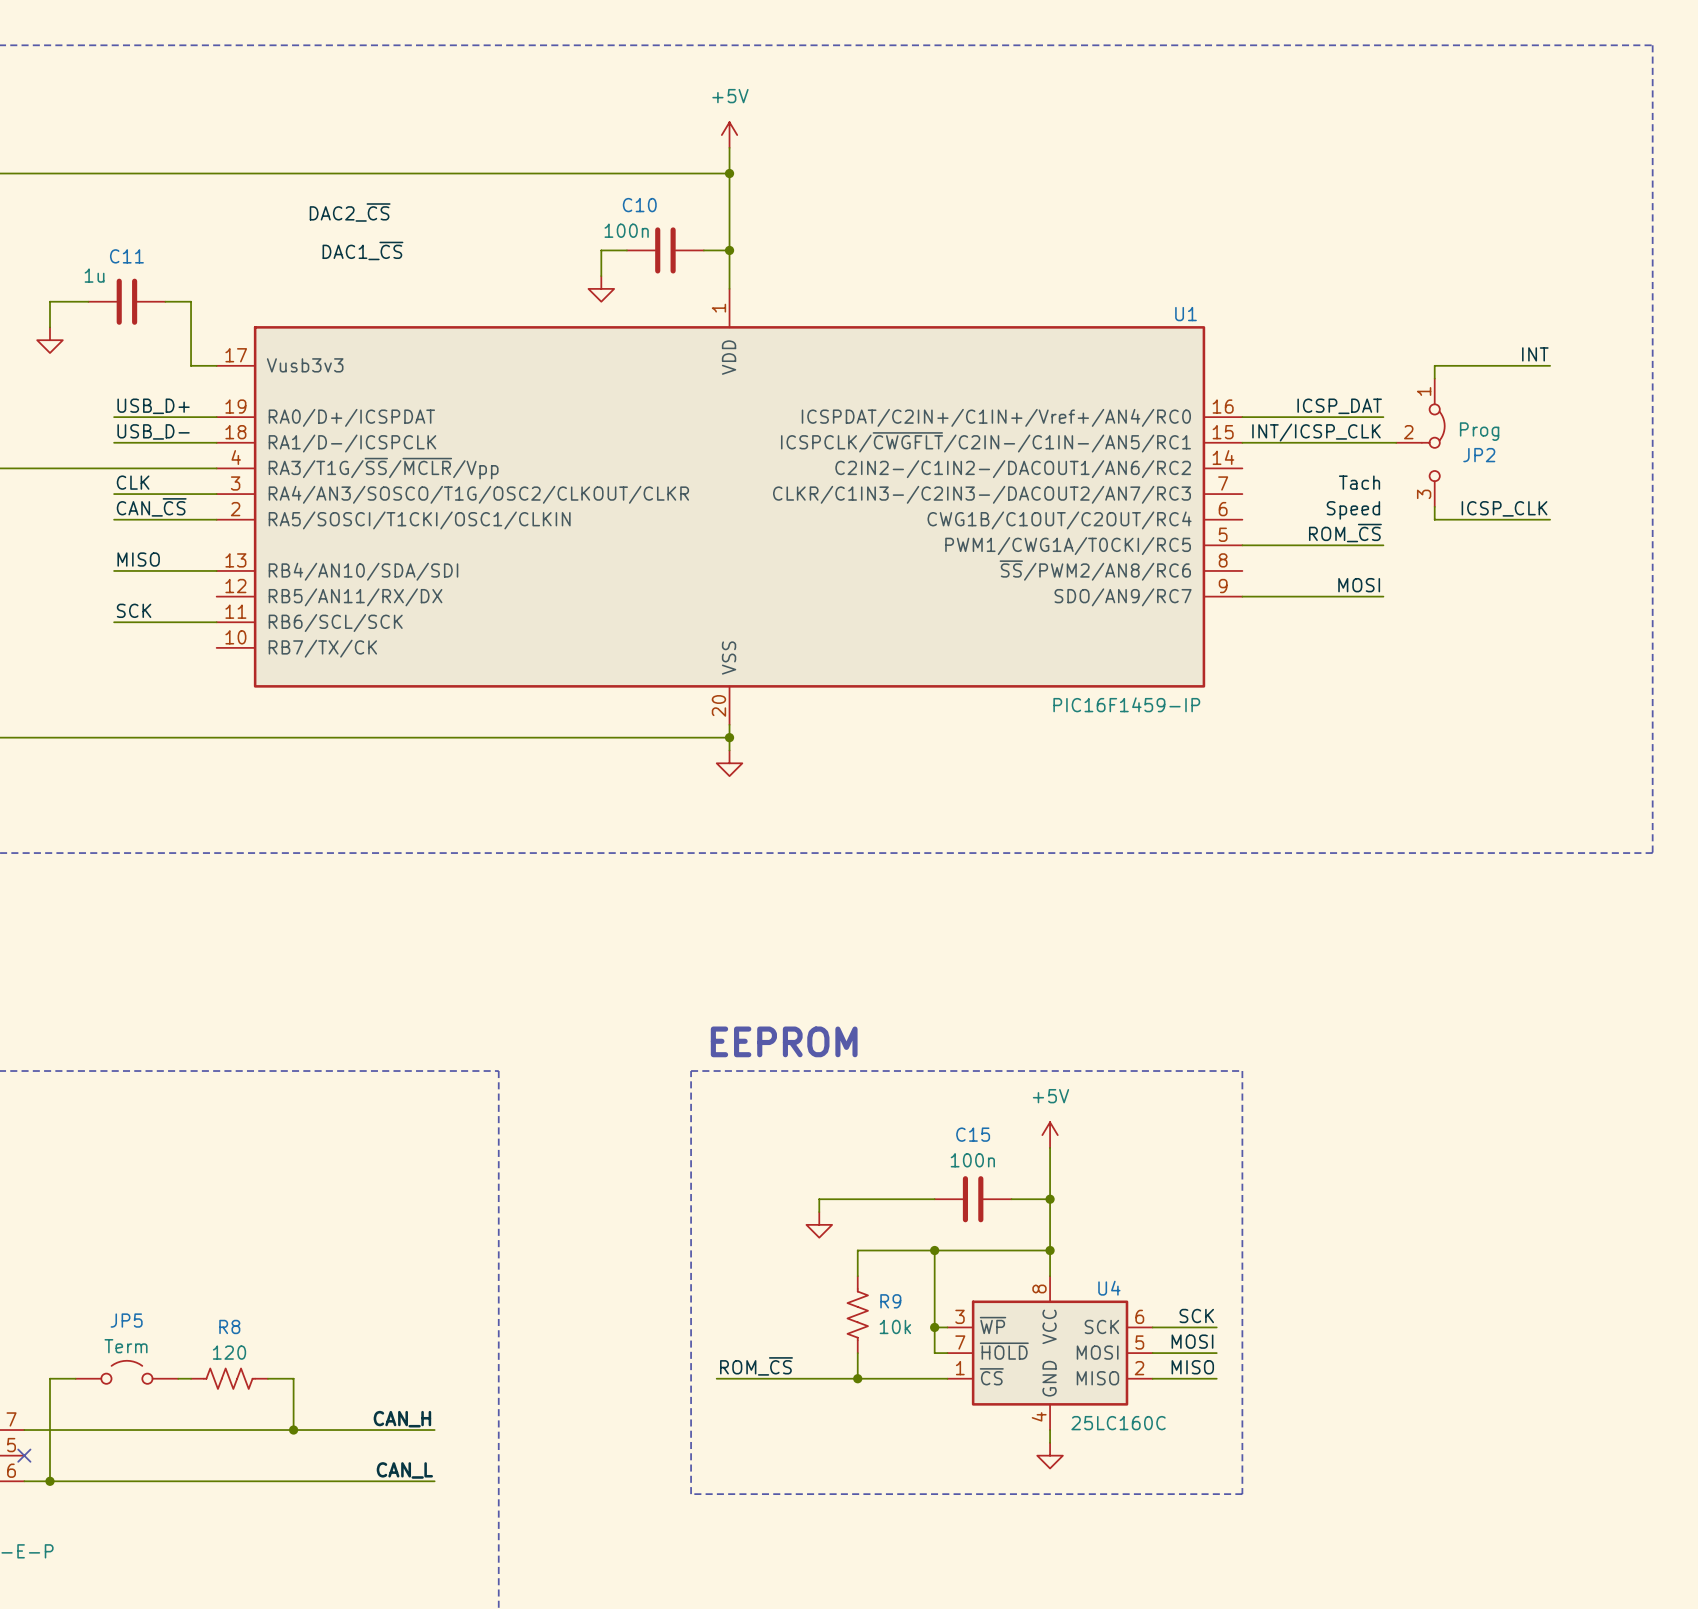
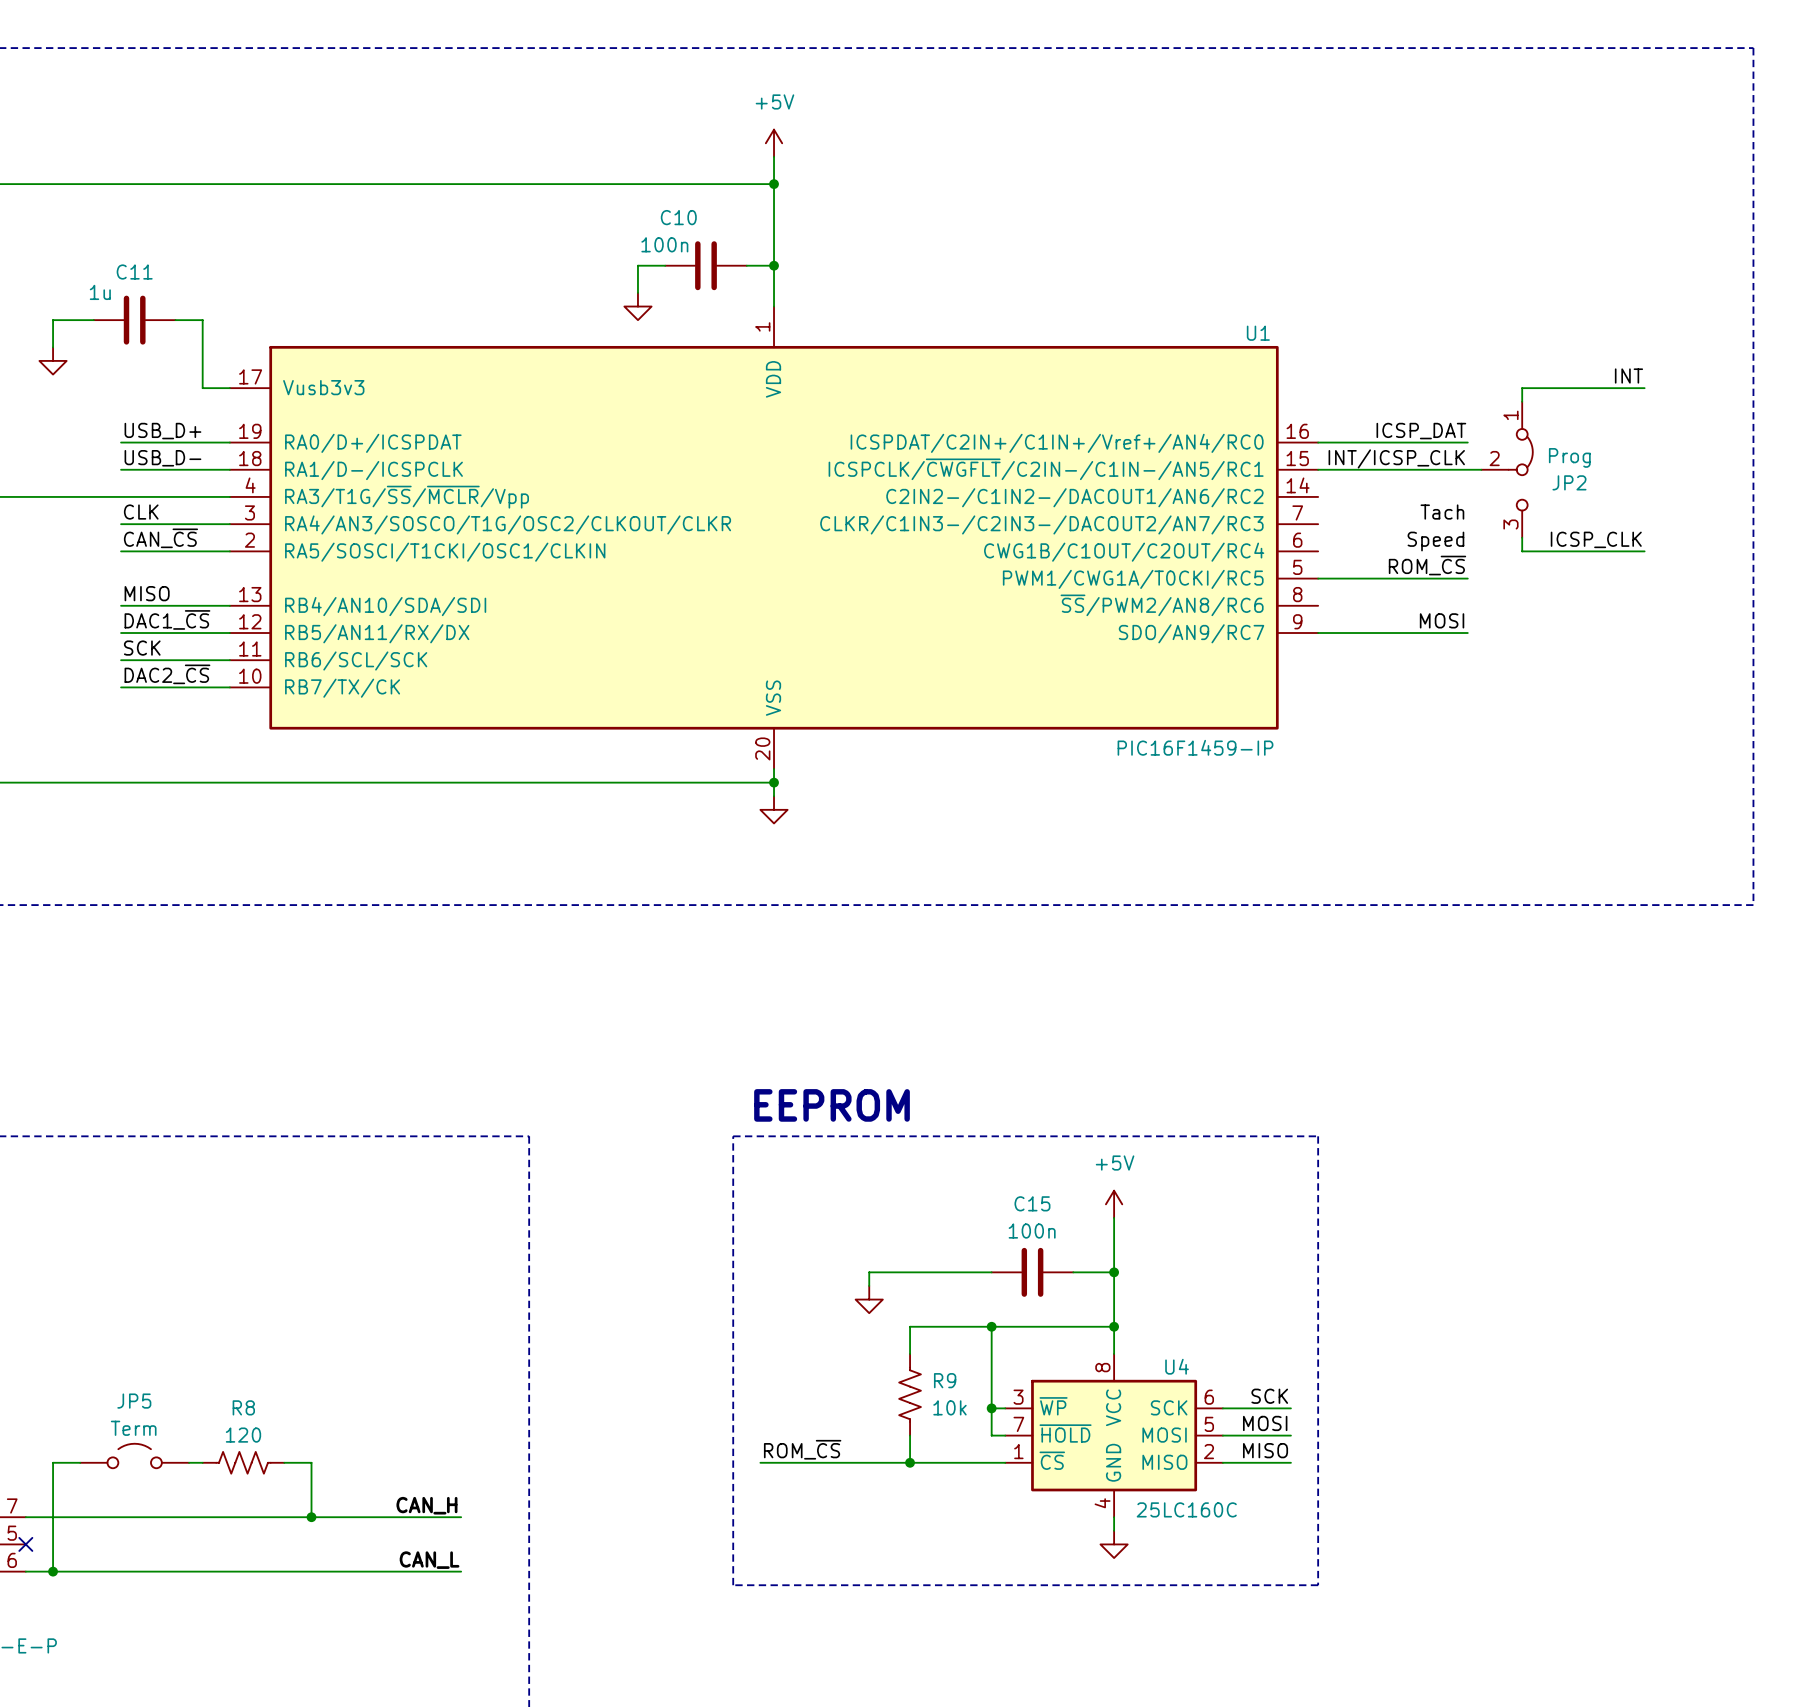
label: DAC2_~{CS} (350, 212) -> none
label: DAC1_~{CS} (362, 250) -> none
label: none -> DAC1_~{CS} (167, 619)
wire: none -> (121, 633) (229, 633)
label: none -> DAC2_~{CS} (167, 674)
wire: none -> (121, 687) (229, 687)

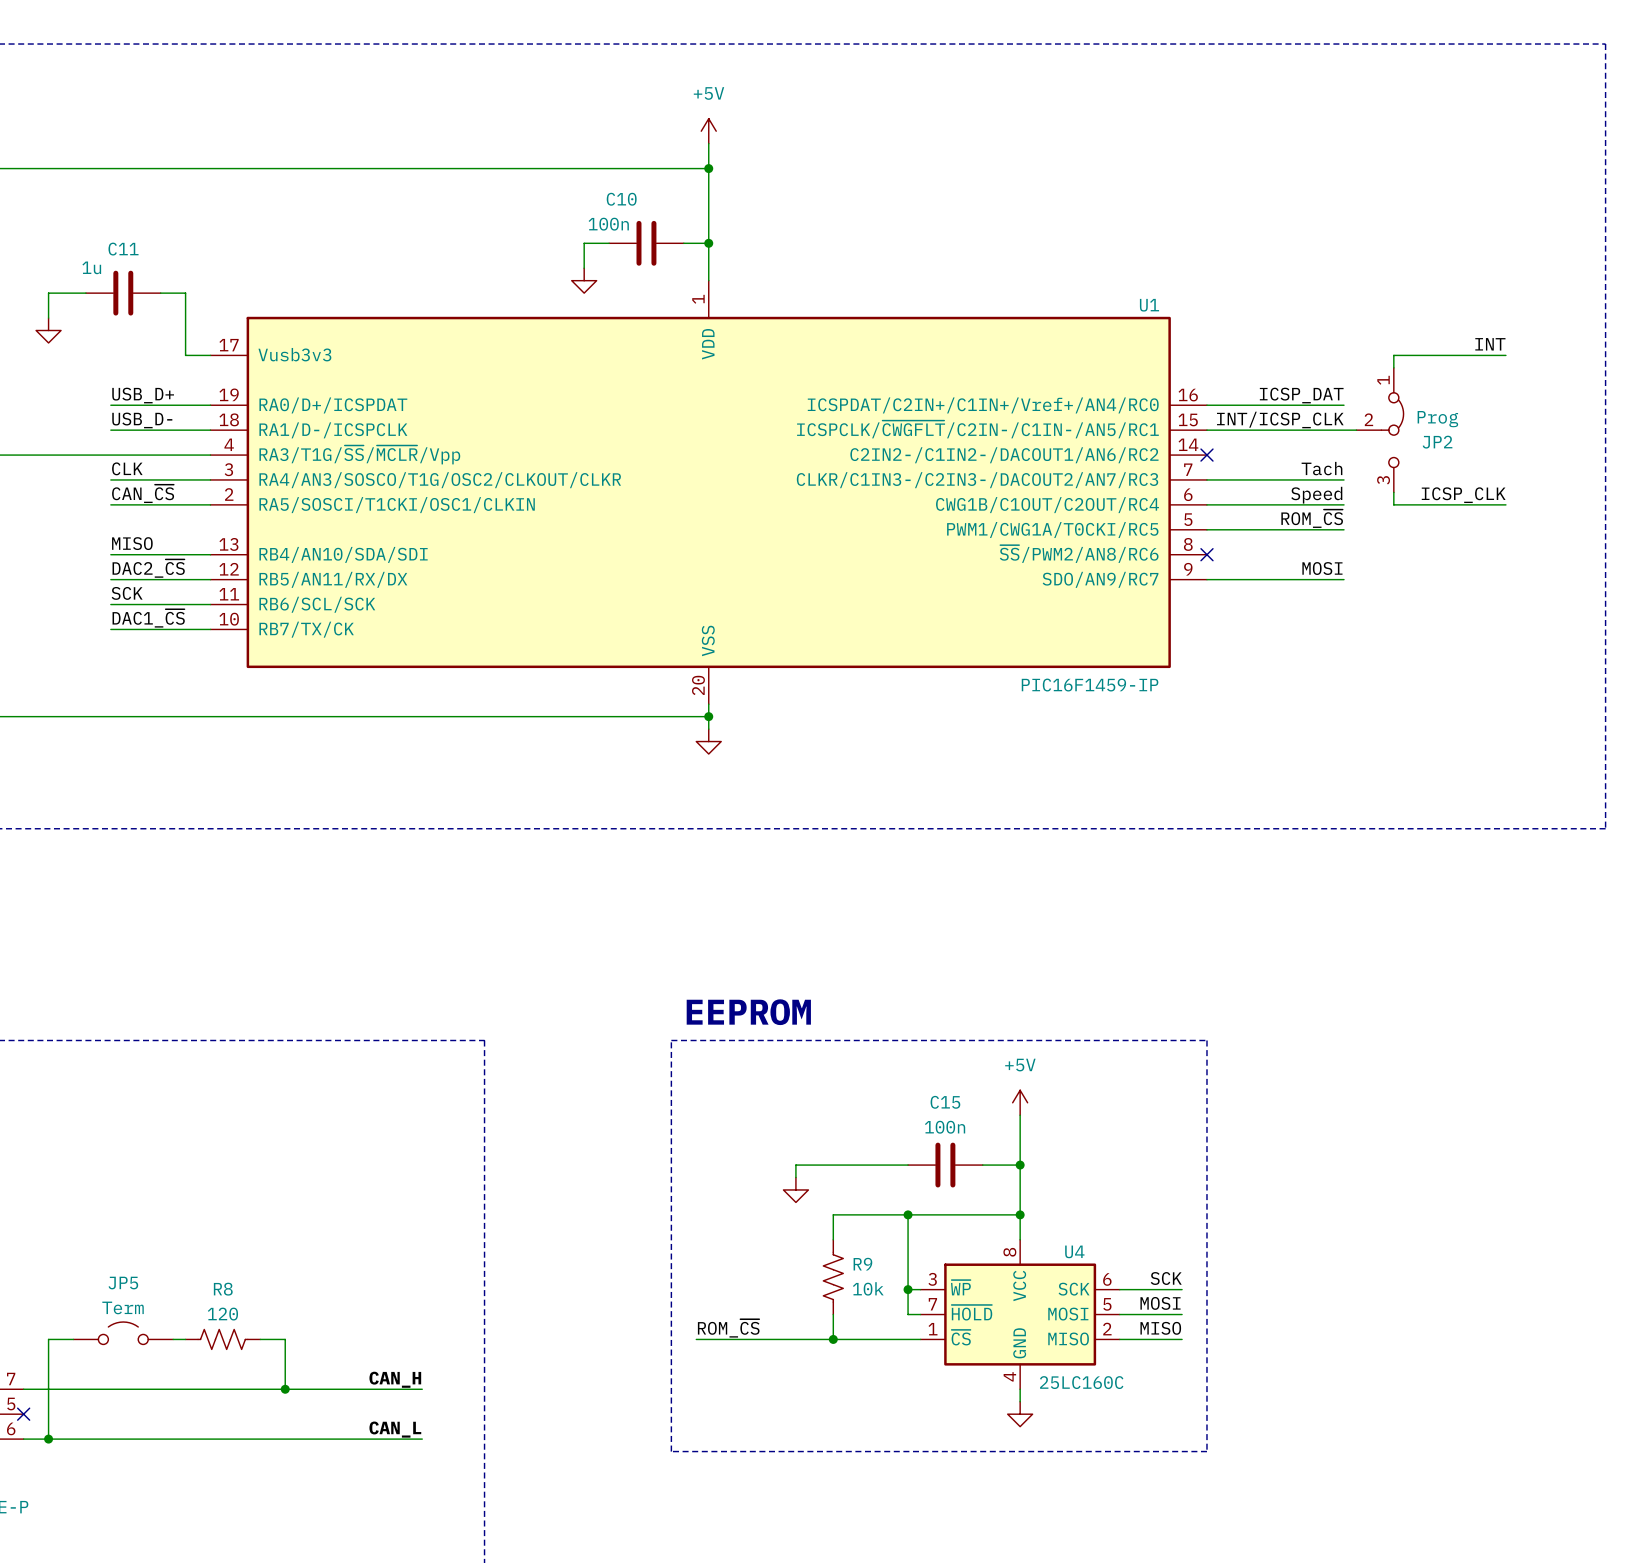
no-connect mark: none -> (1206, 455)
wire: none -> (1206, 479) (1344, 479)
wire: none -> (1206, 504) (1344, 504)
no-connect mark: none -> (1206, 554)
label: DAC1_~{CS} (167, 619) -> DAC2_~{CS} (148, 568)
label: DAC2_~{CS} (167, 674) -> DAC1_~{CS} (148, 618)

